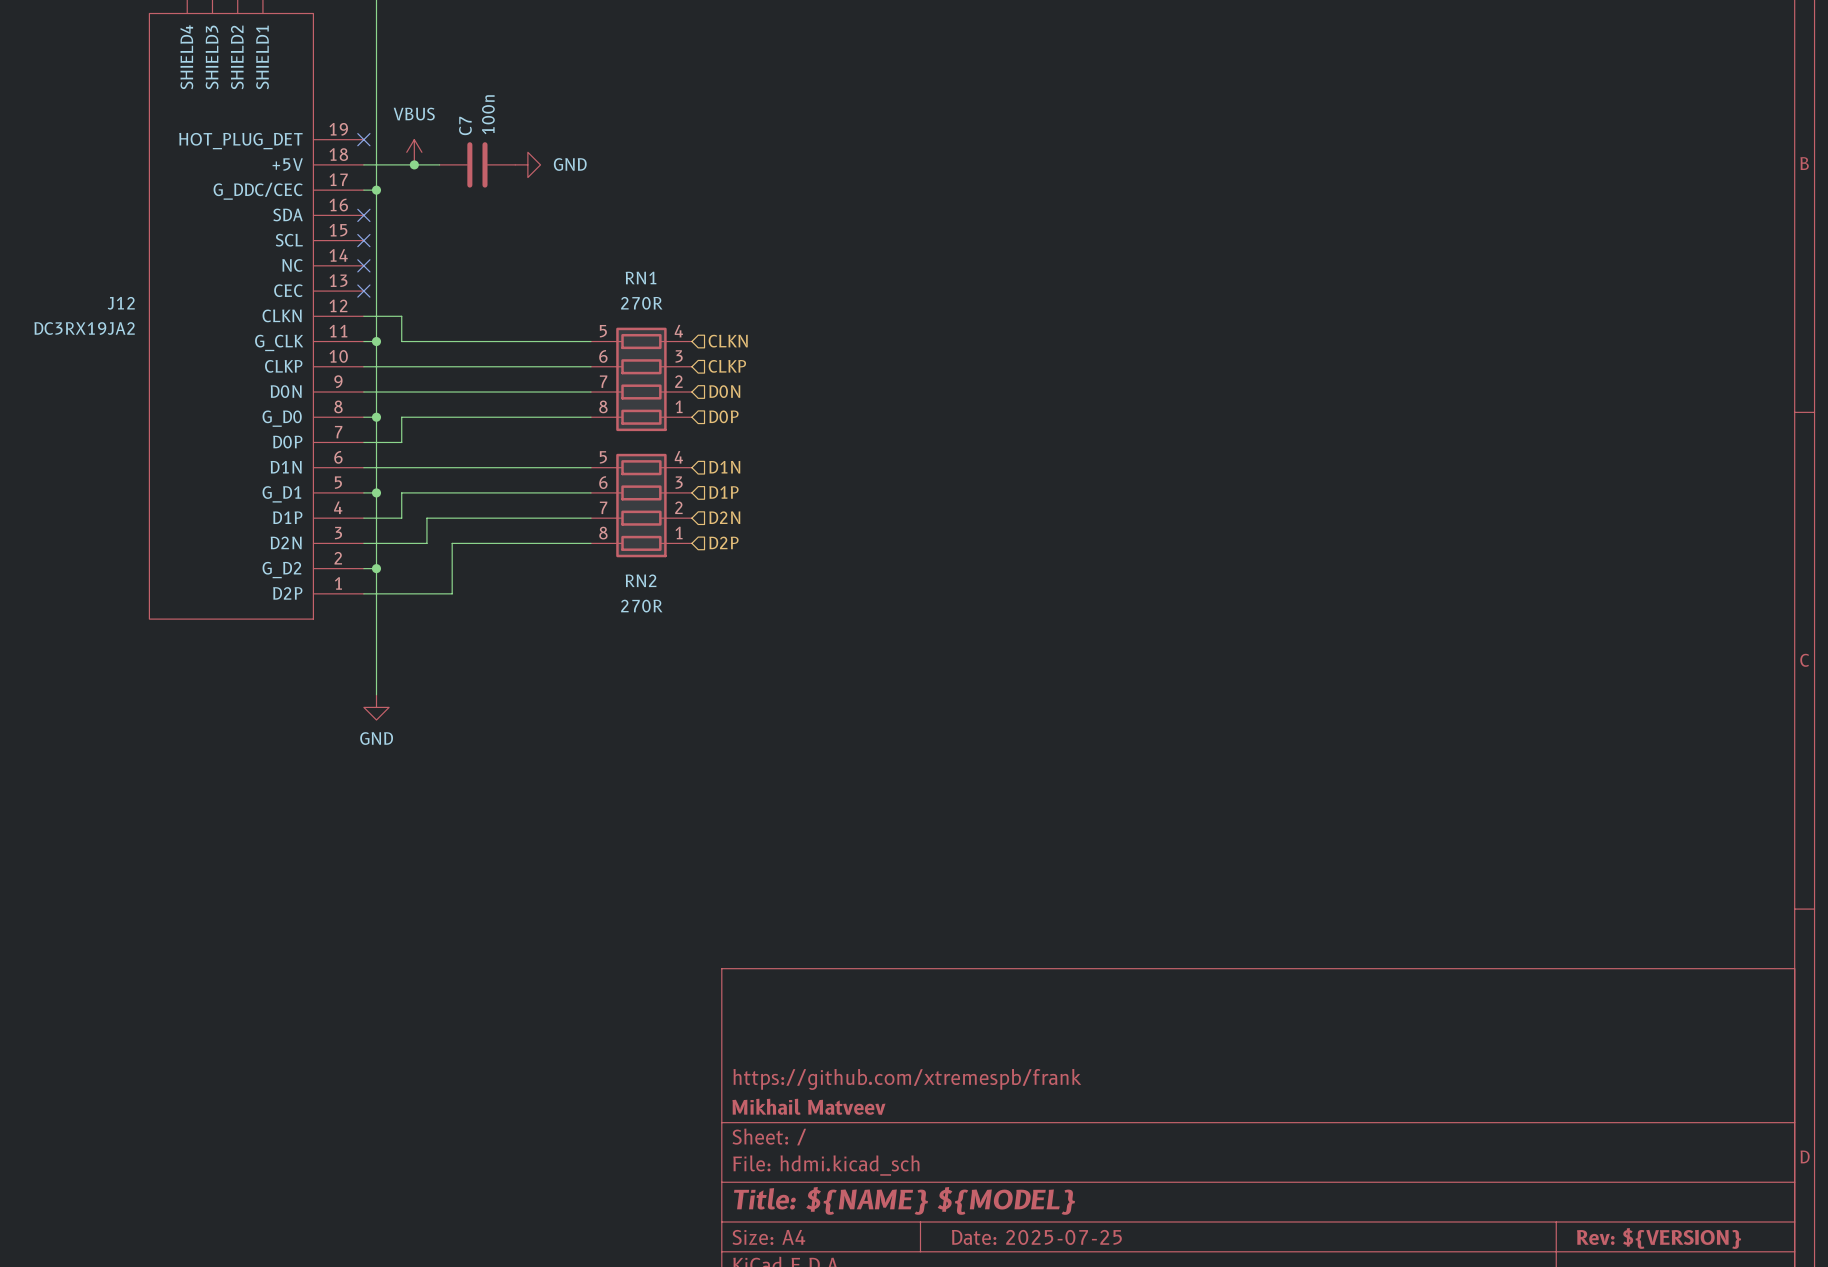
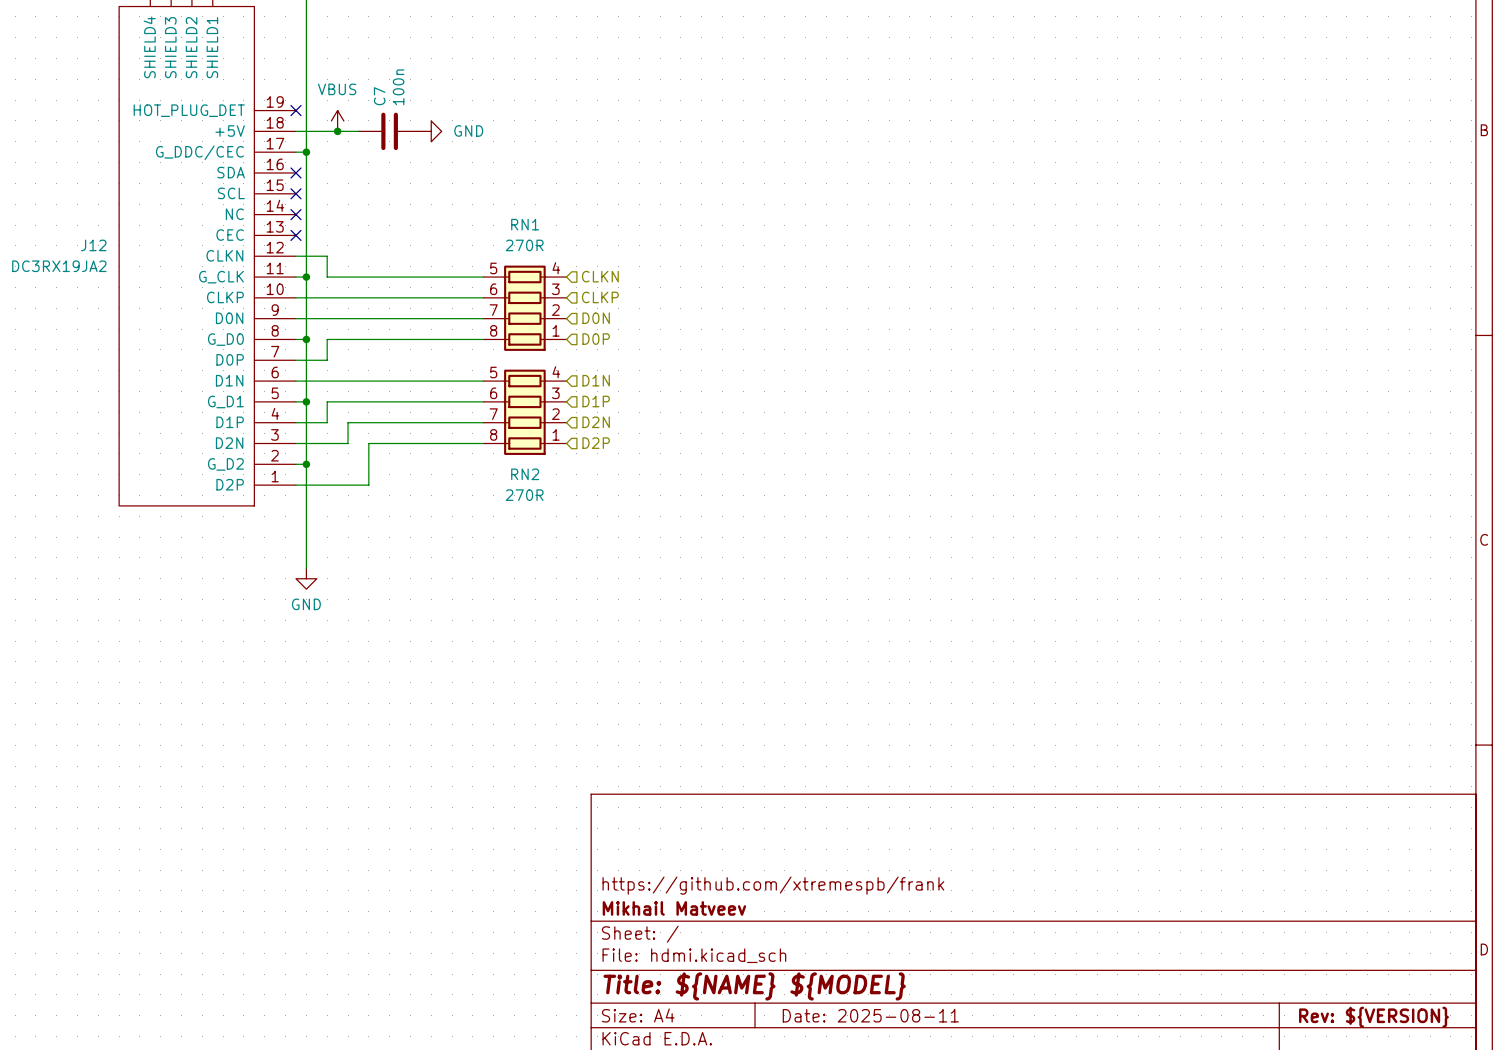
title block: Date: 2025-07-25 (1036, 1237) -> Date: 2025-08-11 (870, 1015)

